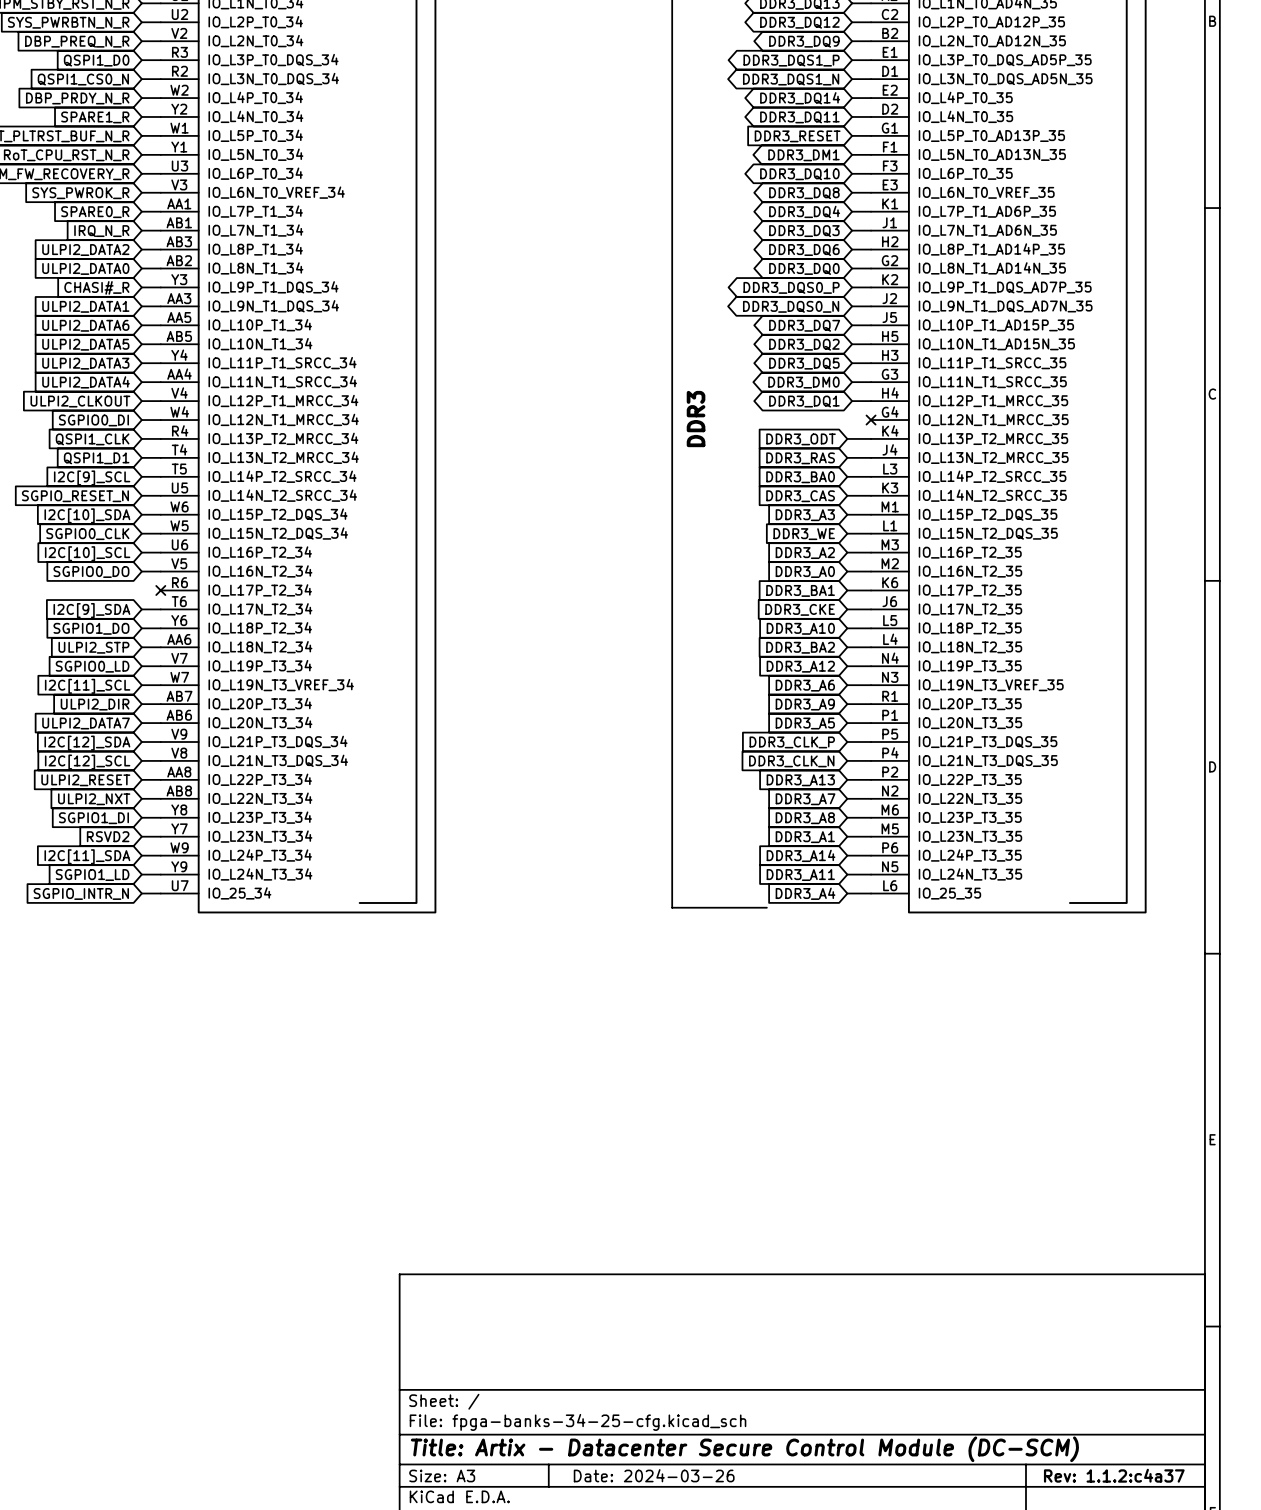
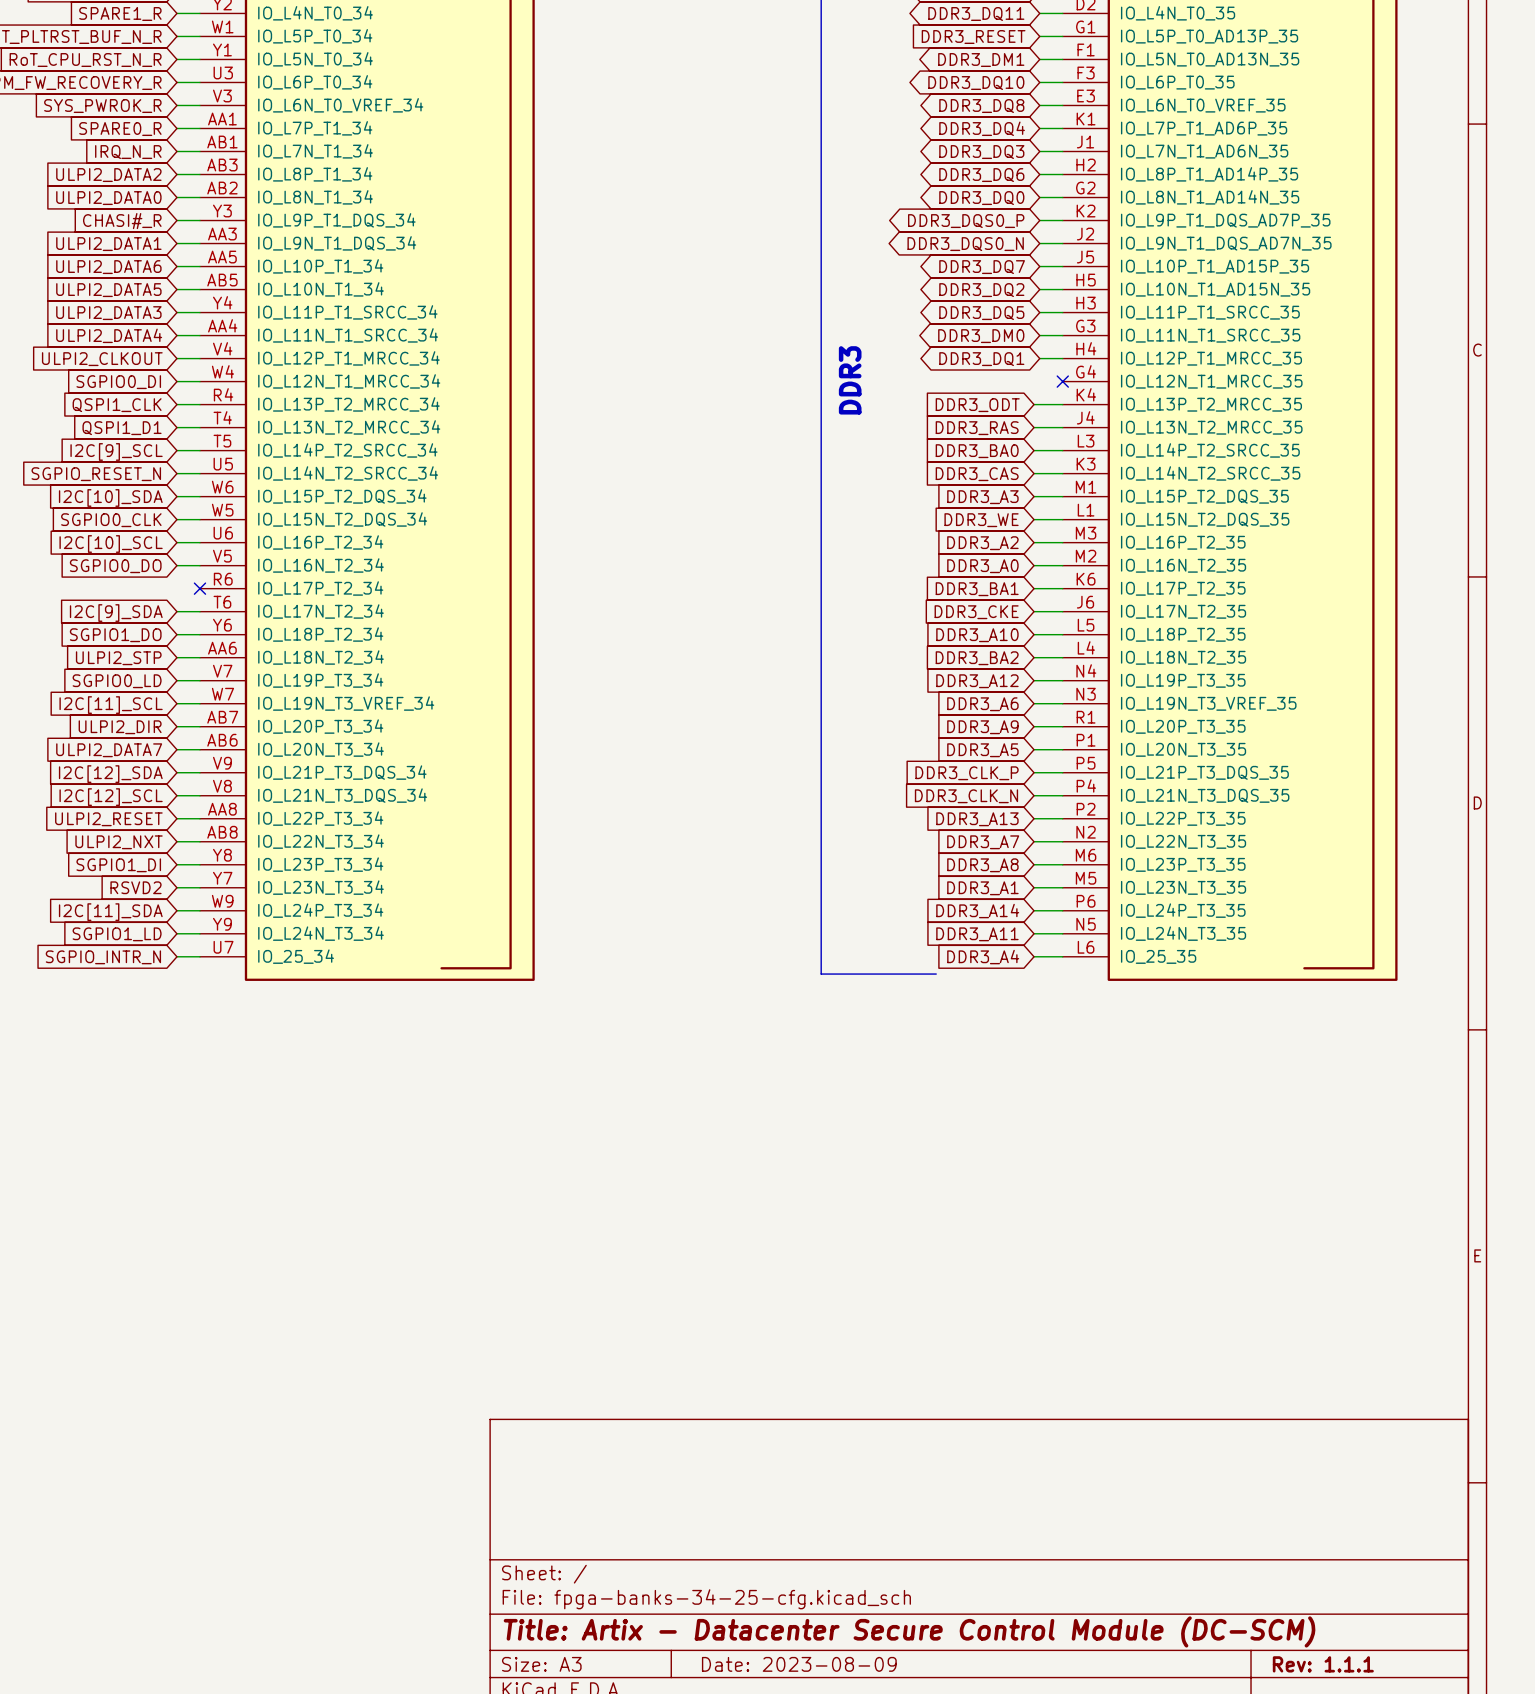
title block: Date: 2024-03-26 (654, 1475) -> Date: 2023-08-09 (799, 1664)
title block: Rev: 1.1.2:c4a37 (1114, 1475) -> Rev: 1.1.1 (1323, 1664)

